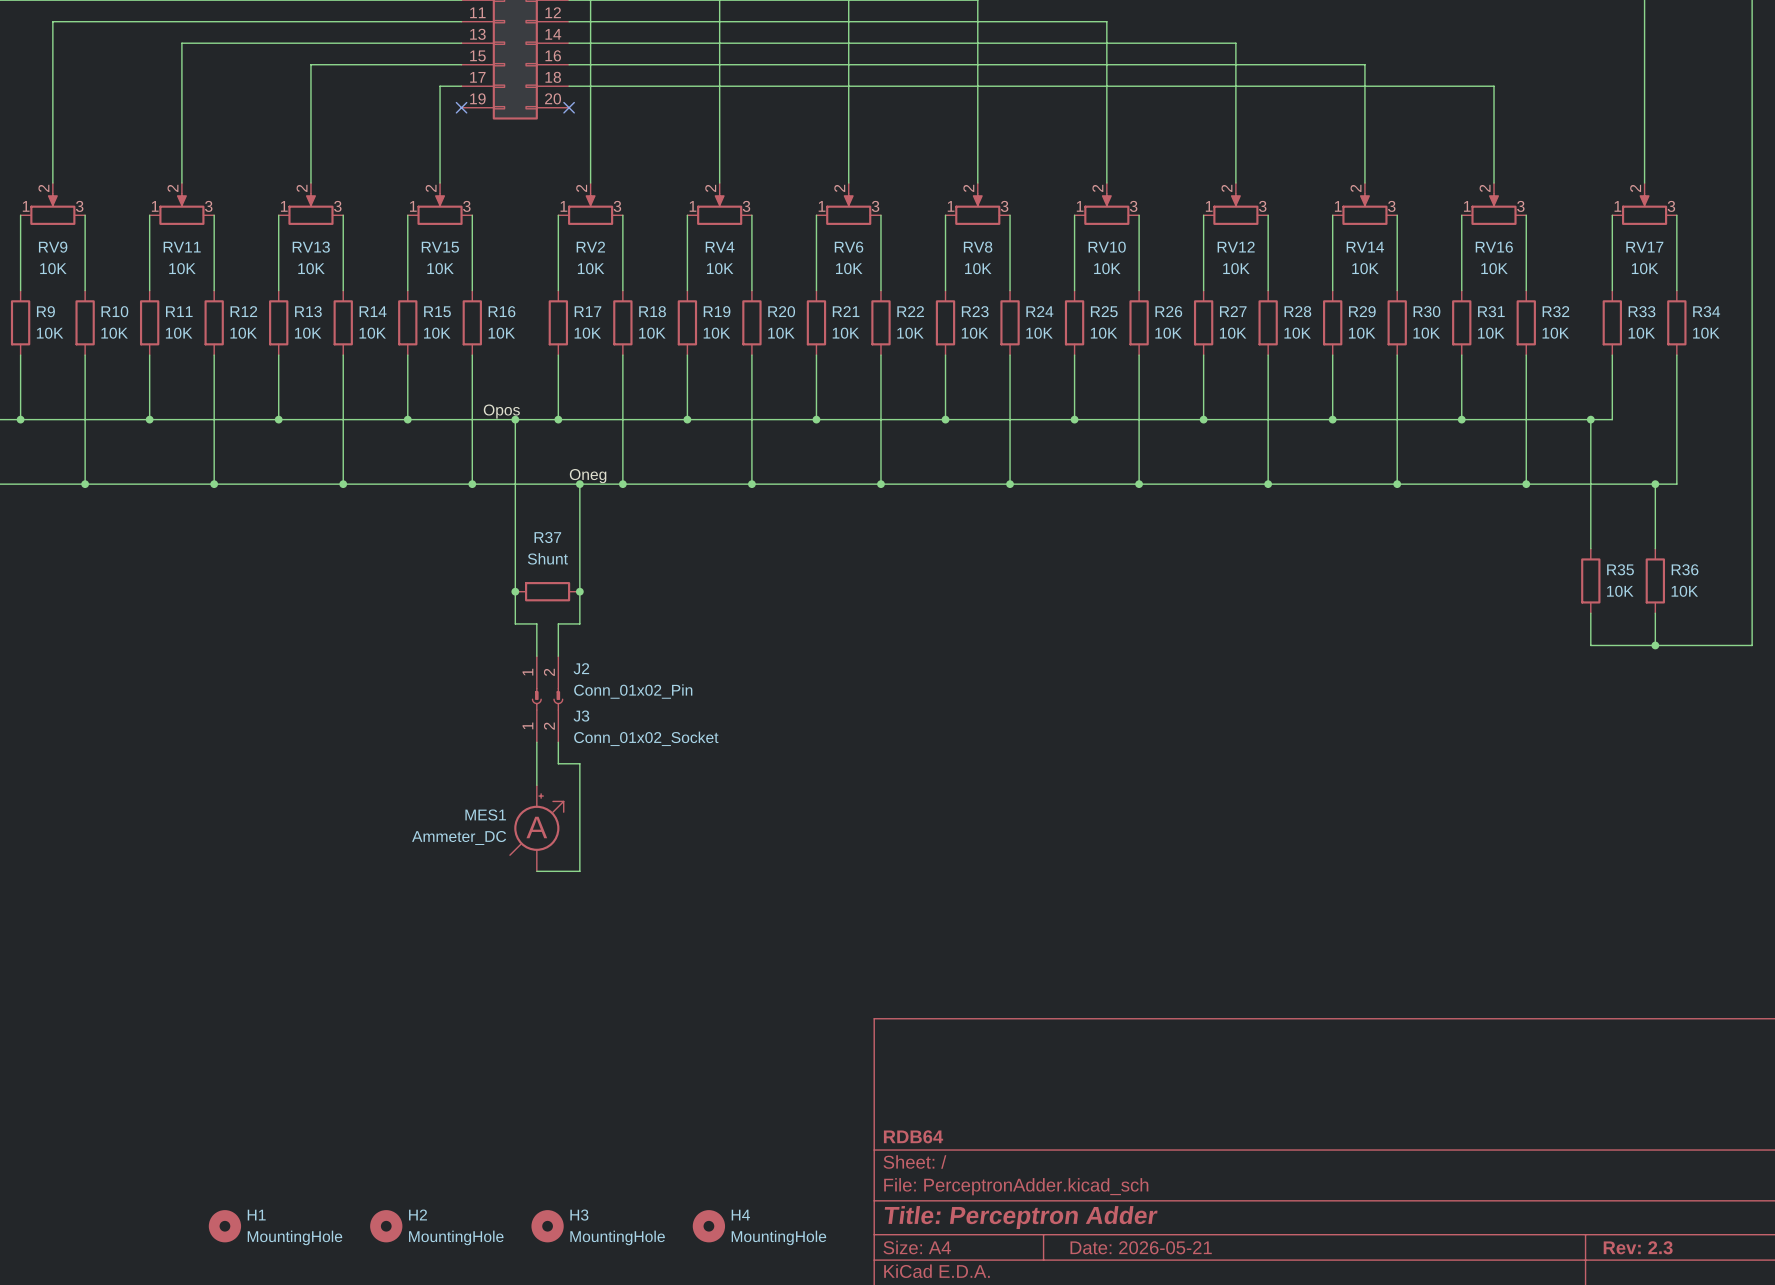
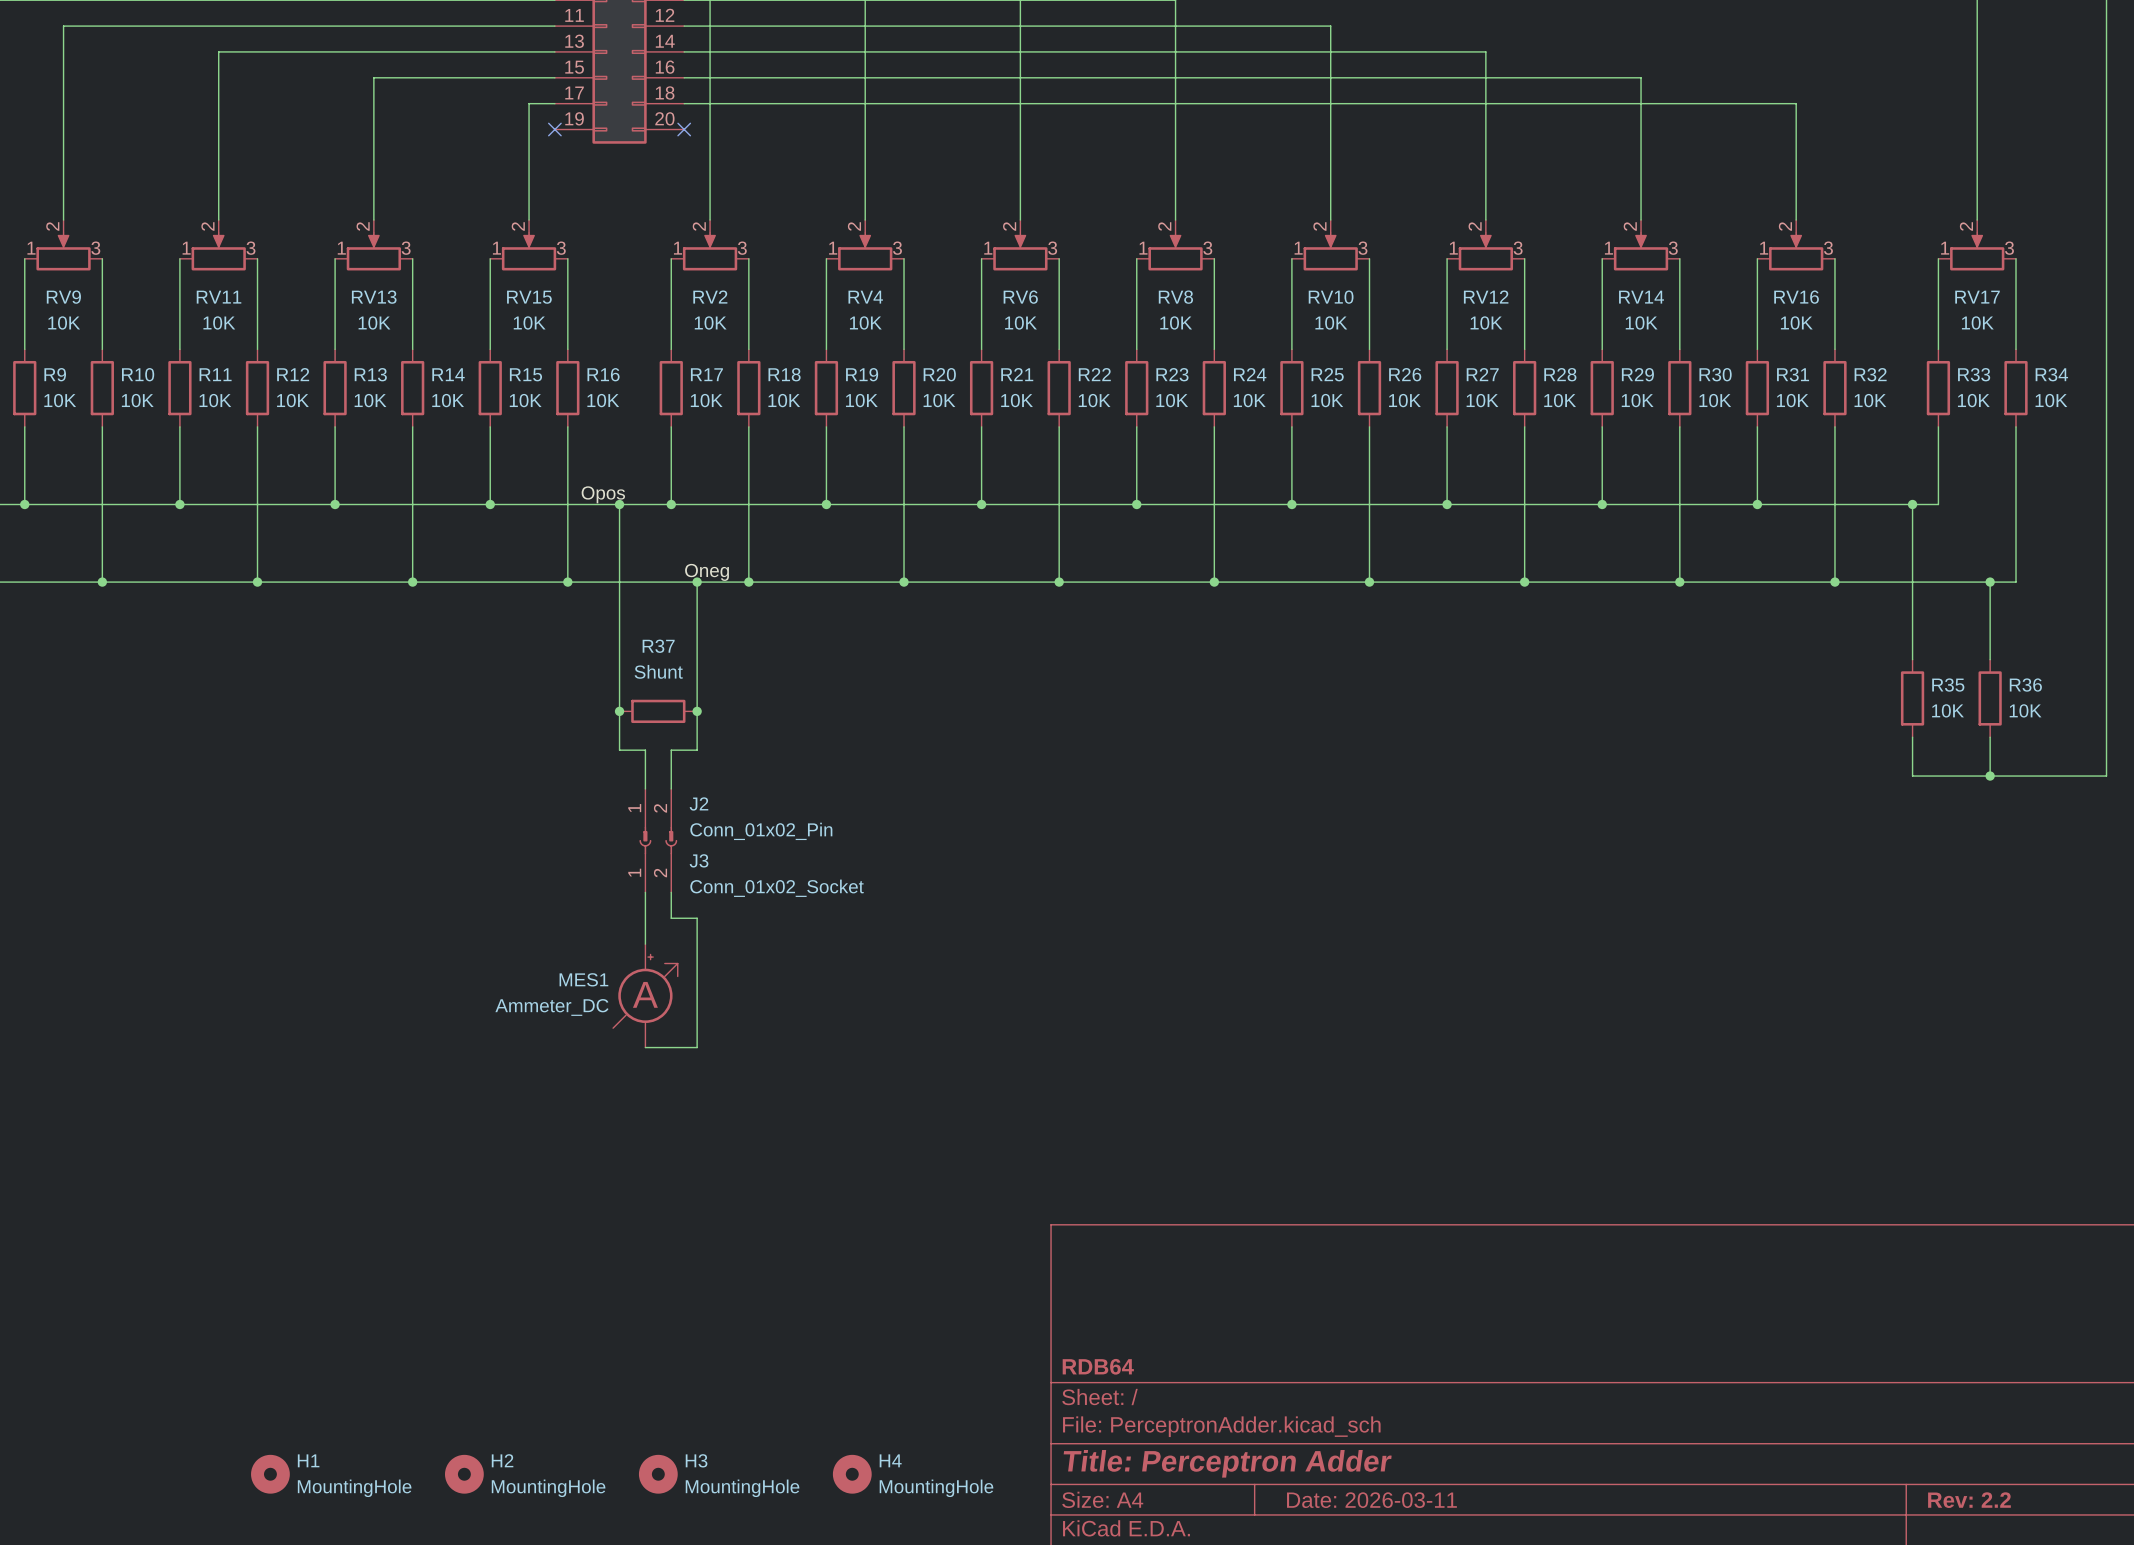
title block: Date: 2026-05-21 (1141, 1247) -> Date: 2026-03-11 (1371, 1500)
title block: Rev: 2.3 (1638, 1247) -> Rev: 2.2 (1969, 1500)

